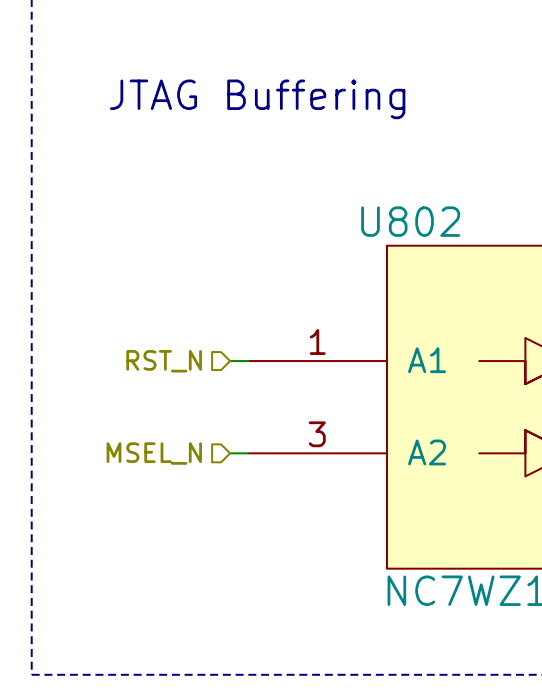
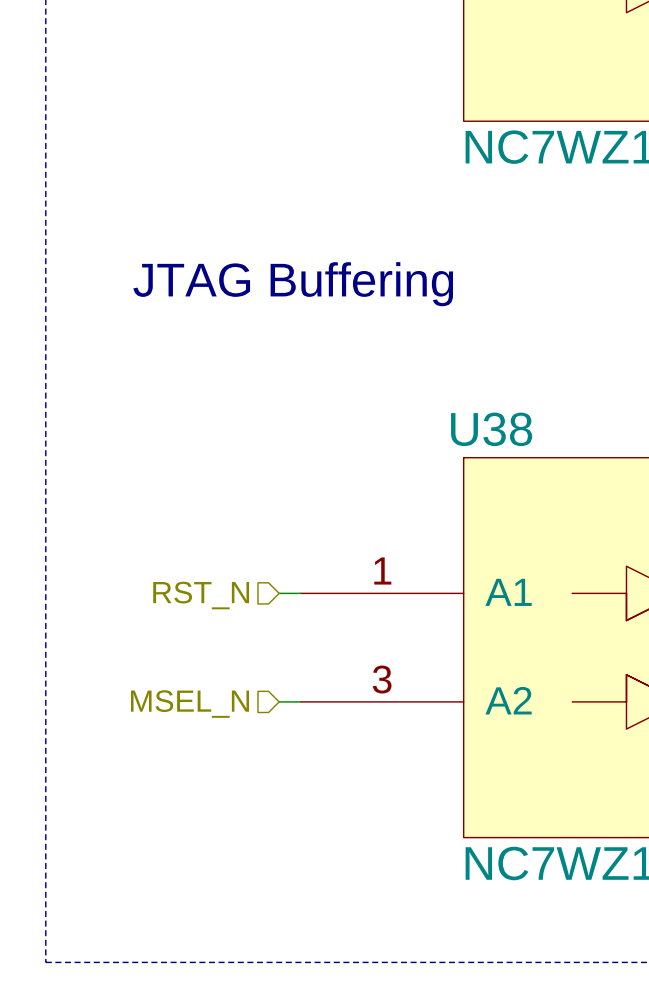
U802 name: U802 (410, 221) -> U38 (491, 429)

